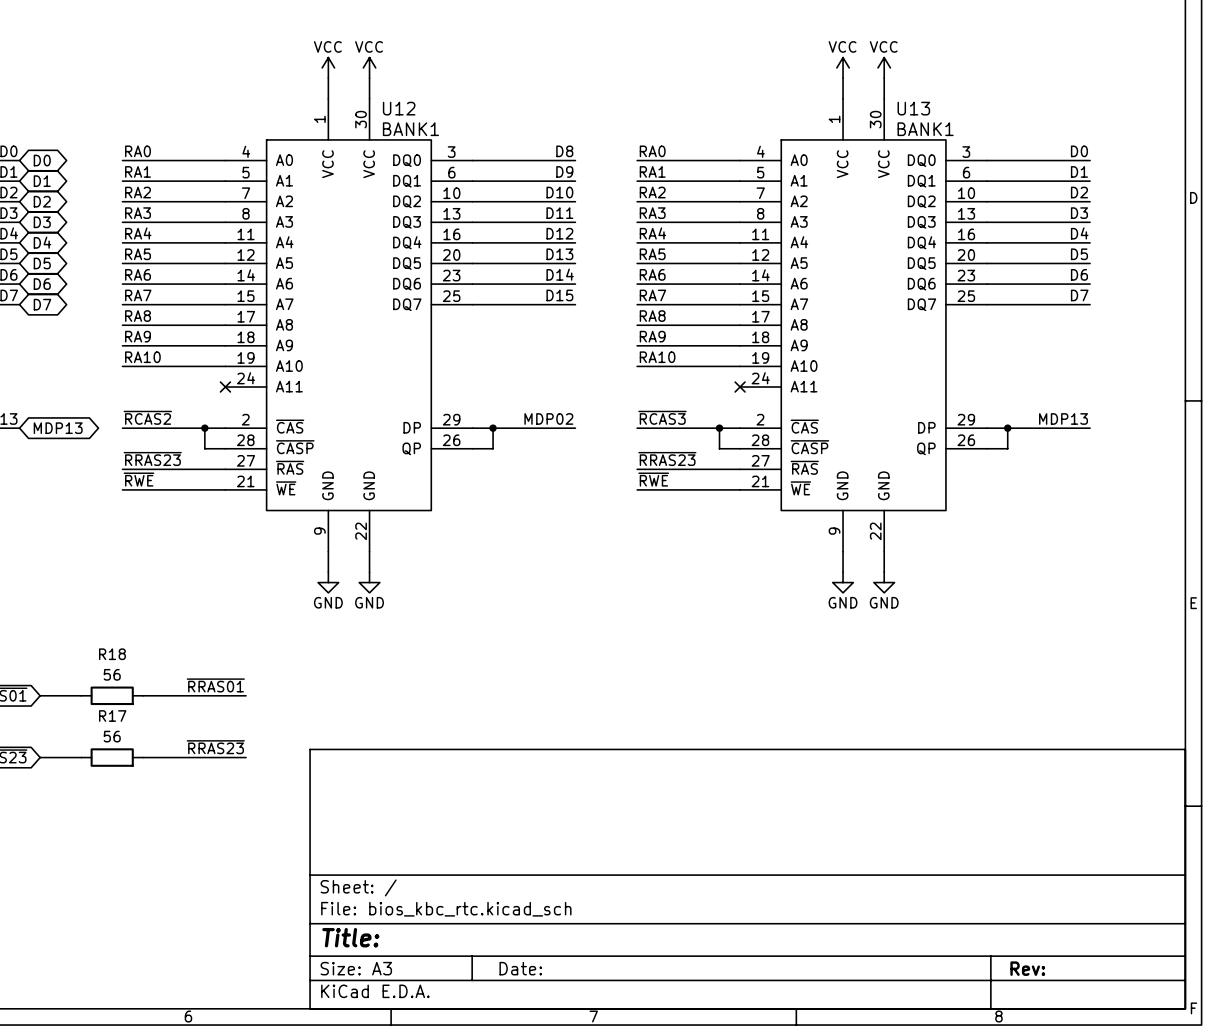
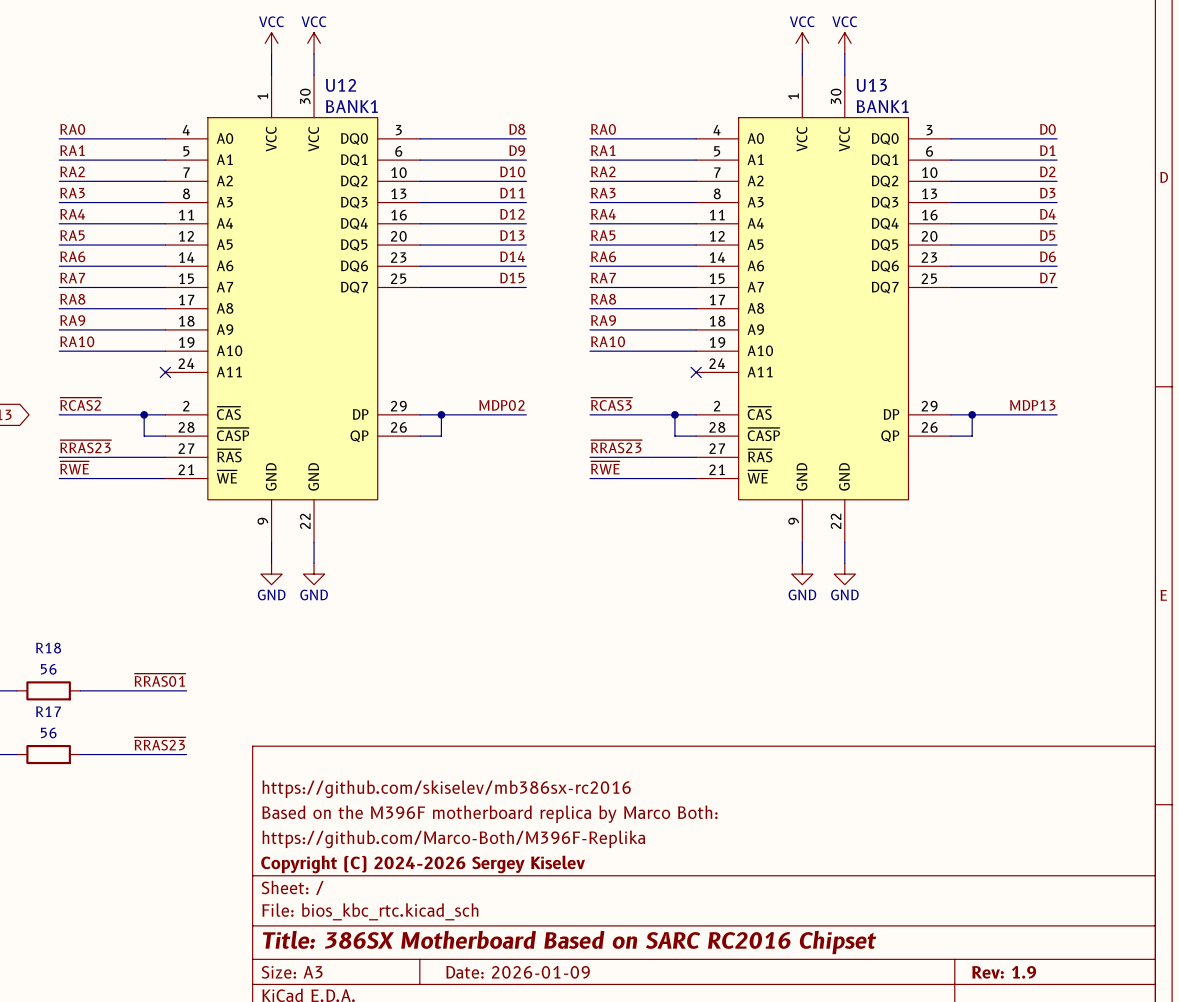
title block: none -> https://github.com/skiselev/mb386sx-rc2016 (446, 789)
title block: none -> Based on the M396F motherboard replica by Marco Both: (489, 814)
title block: none -> https://github.com/Marco-Both/M396F-Replika (453, 839)
title block: none -> Copyright (C) 2024-2026 Sergey Kiselev (423, 864)
title block: Title: (350, 937) -> Title: 386SX Motherboard Based on SARC RC2016 Chipset (569, 942)
title block: Date: (520, 968) -> Date: 2026-01-09 (518, 972)
title block: Rev: (1027, 968) -> Rev: 1.9 (1004, 972)

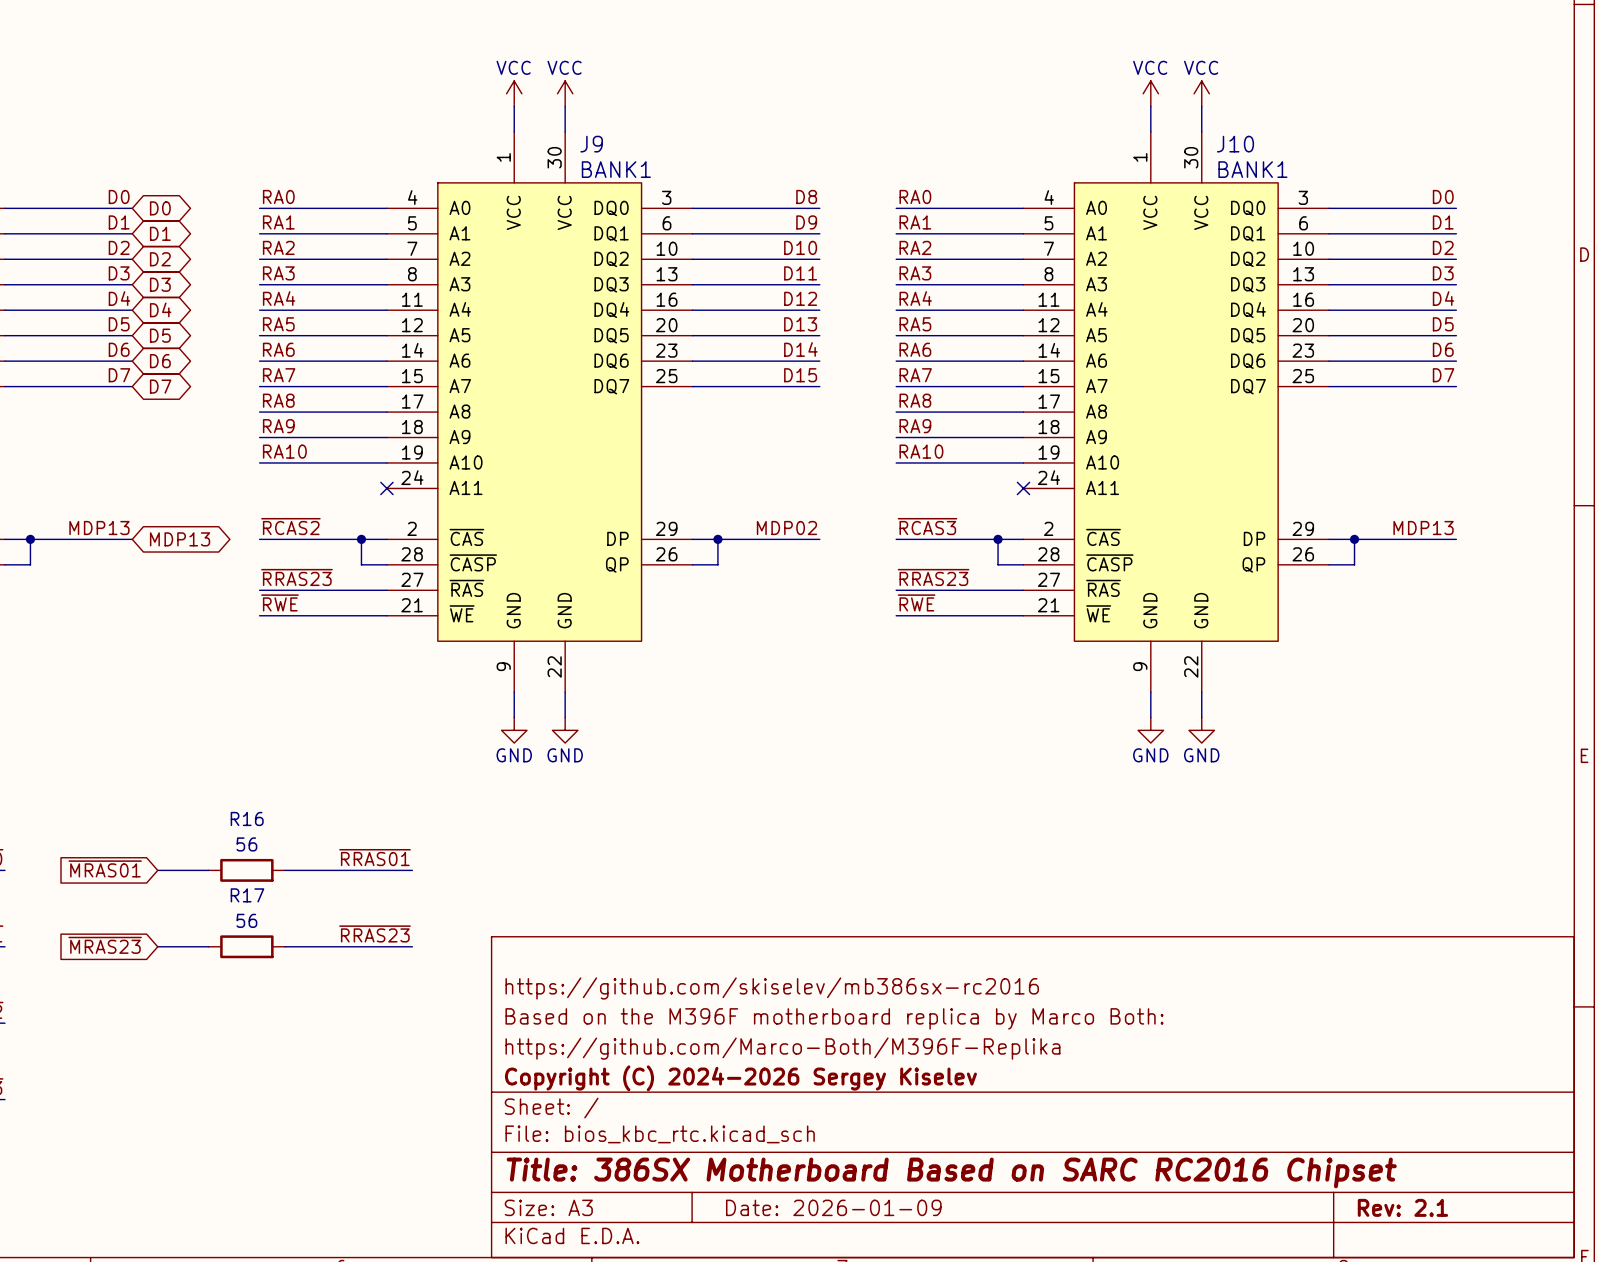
U12 name: U12 (341, 85) -> J9 (591, 144)
U13 name: U13 (871, 85) -> J10 (1235, 144)
R18 name: R18 (48, 648) -> R16 (247, 818)
title block: Rev: 1.9 (1004, 972) -> Rev: 2.1 (1402, 1207)

